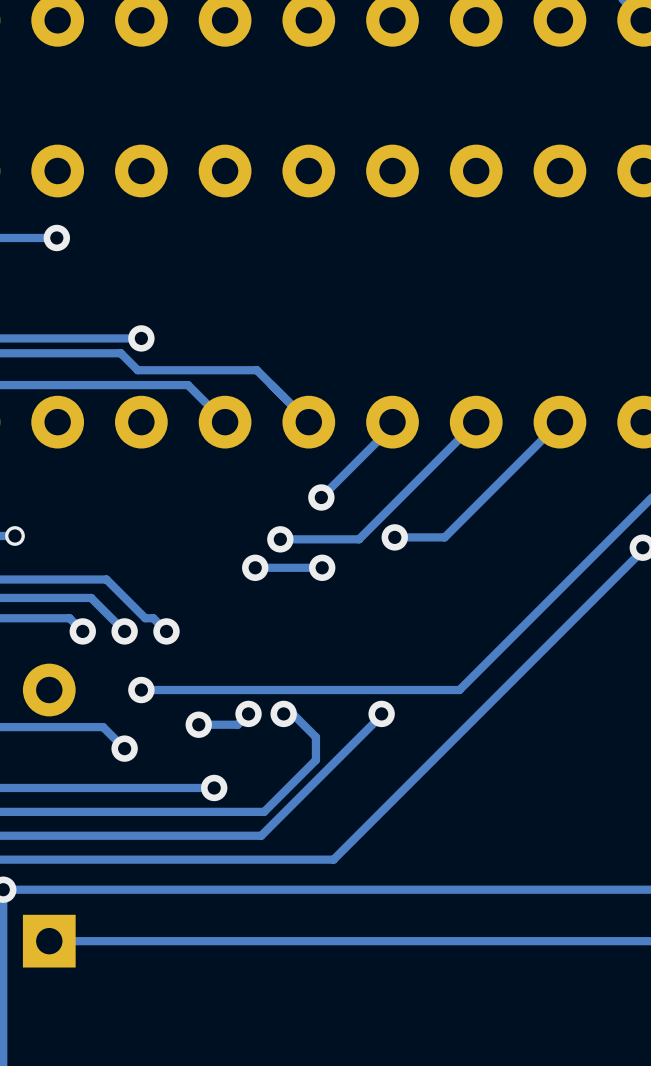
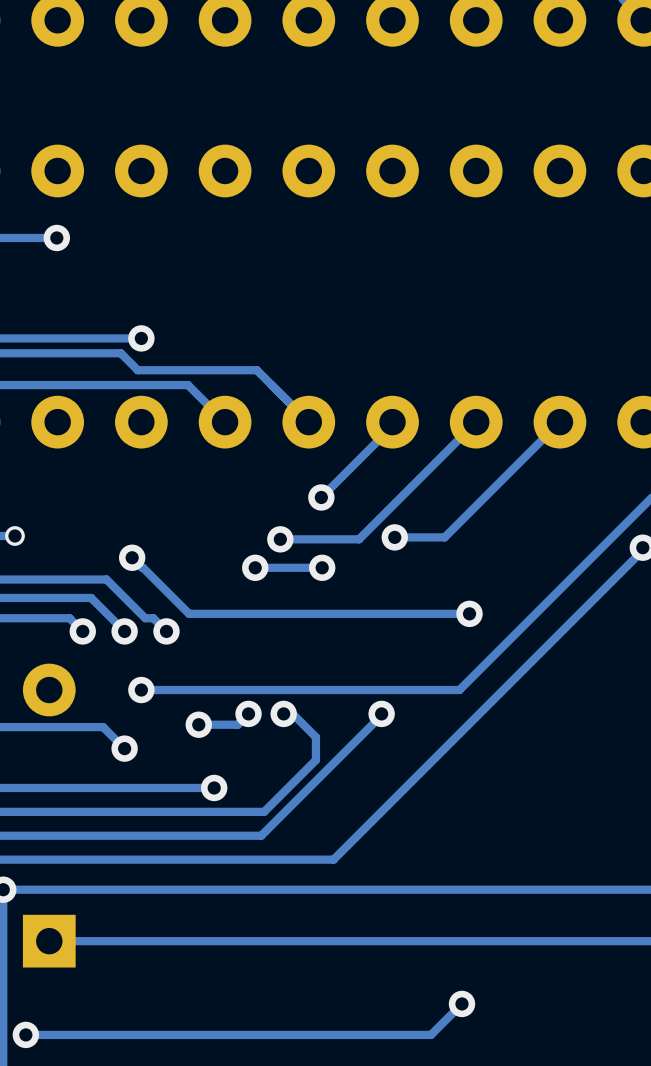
track: none -> (132, 557) (189, 613) (469, 613)
via: none -> (132, 557)
via: none -> (469, 613)
track: none -> (462, 1003) (431, 1034) (25, 1034)
via: none -> (462, 1003)
via: none -> (25, 1034)

